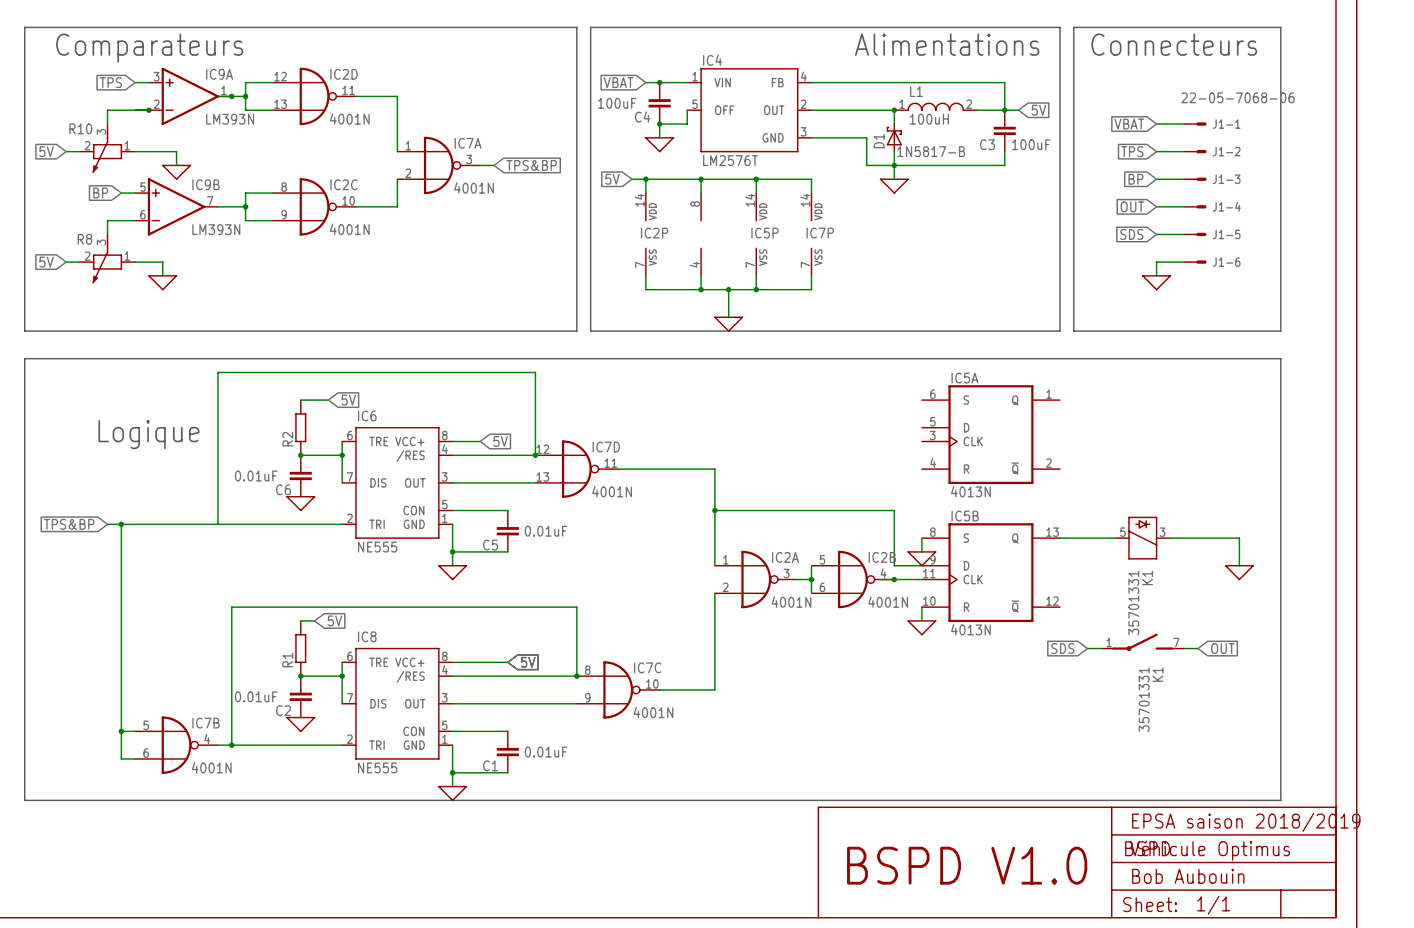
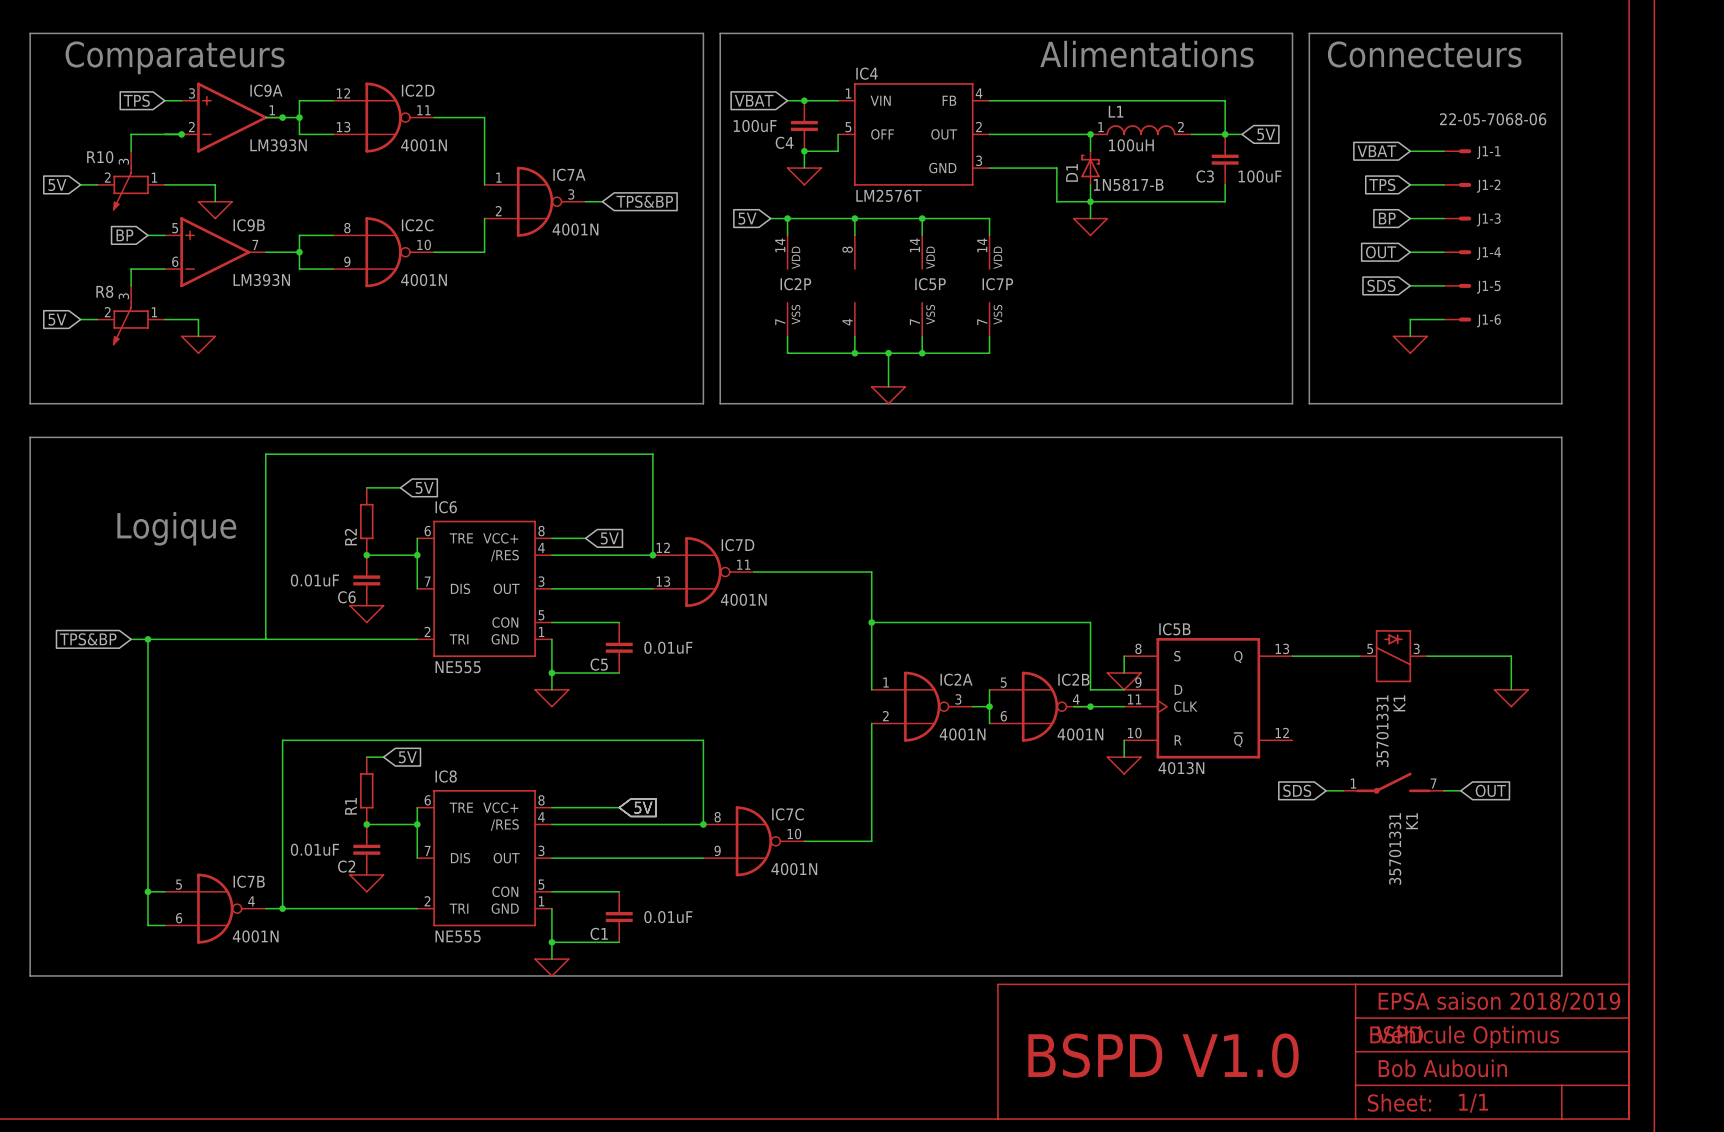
IC5A: 4013N (990, 434) -> none

